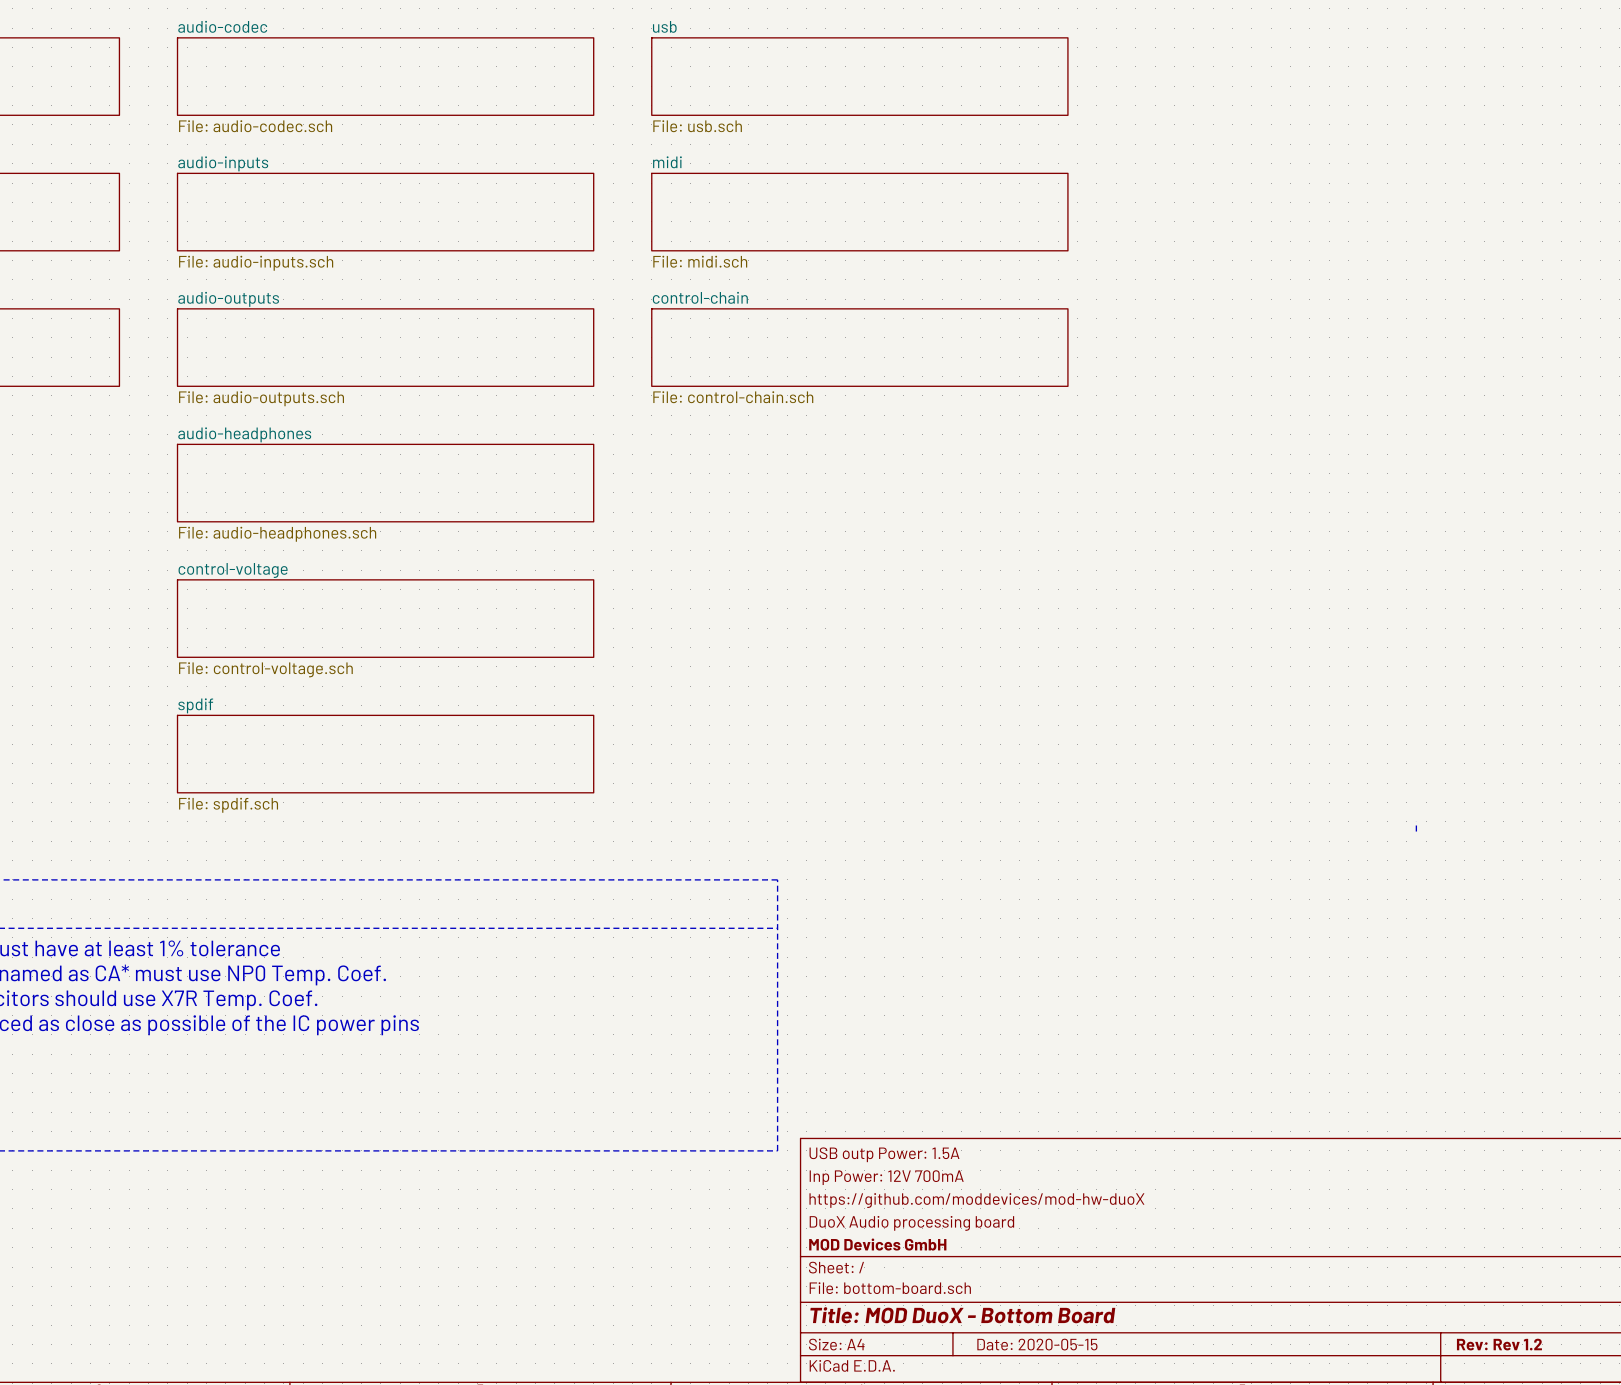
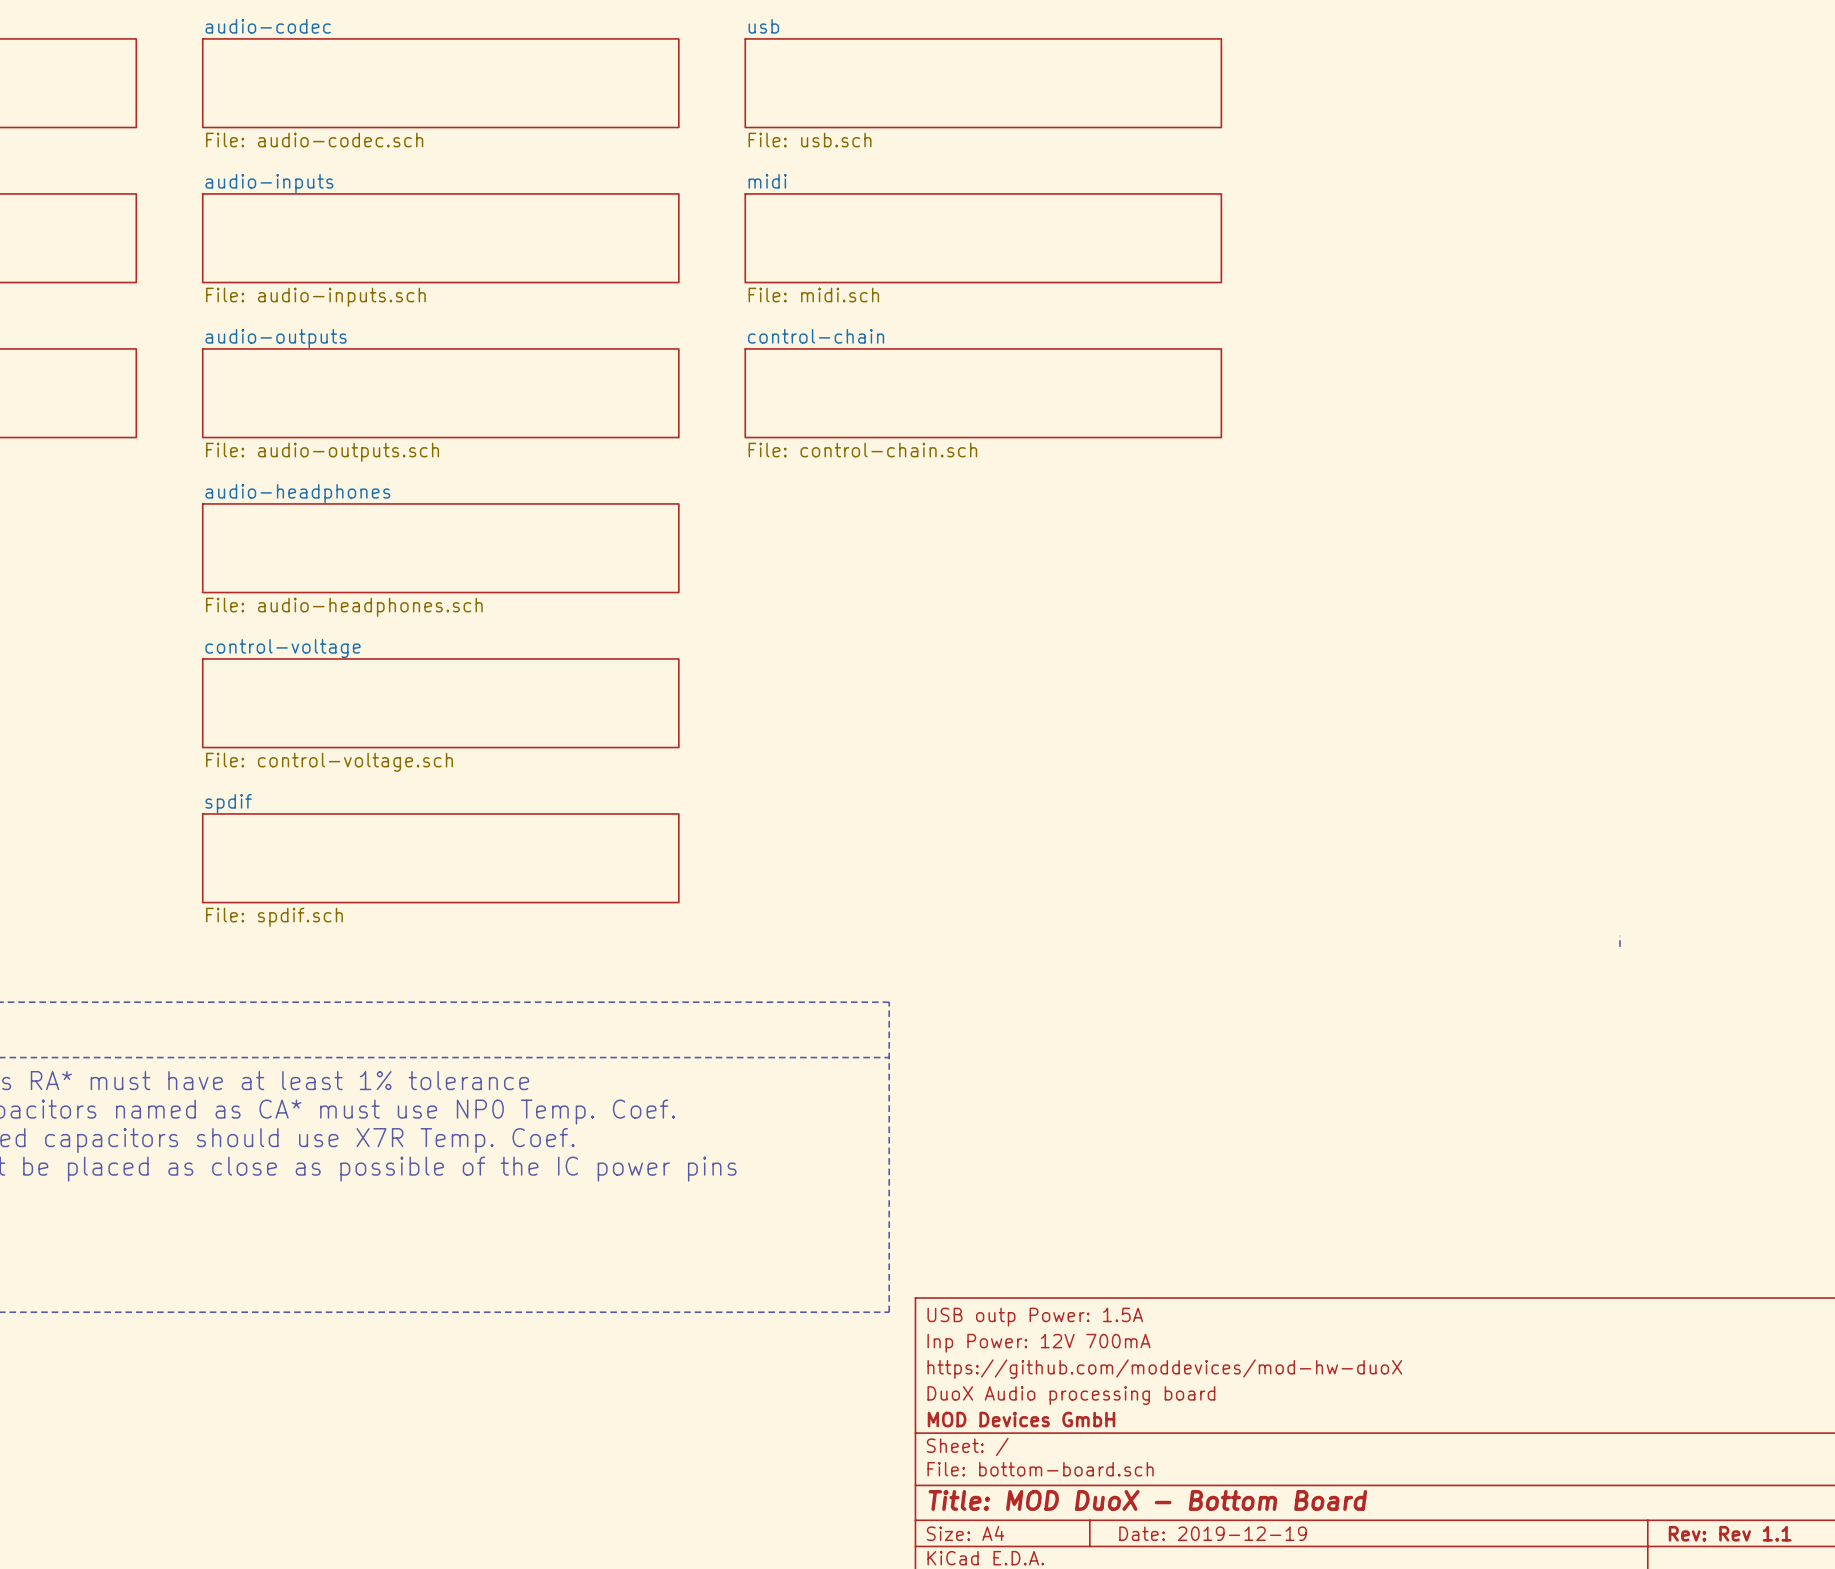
title block: Date: 2020-05-15 (1037, 1344) -> Date: 2019-12-19 (1213, 1533)
title block: Rev: Rev 1.2 (1499, 1344) -> Rev: Rev 1.1 (1730, 1533)

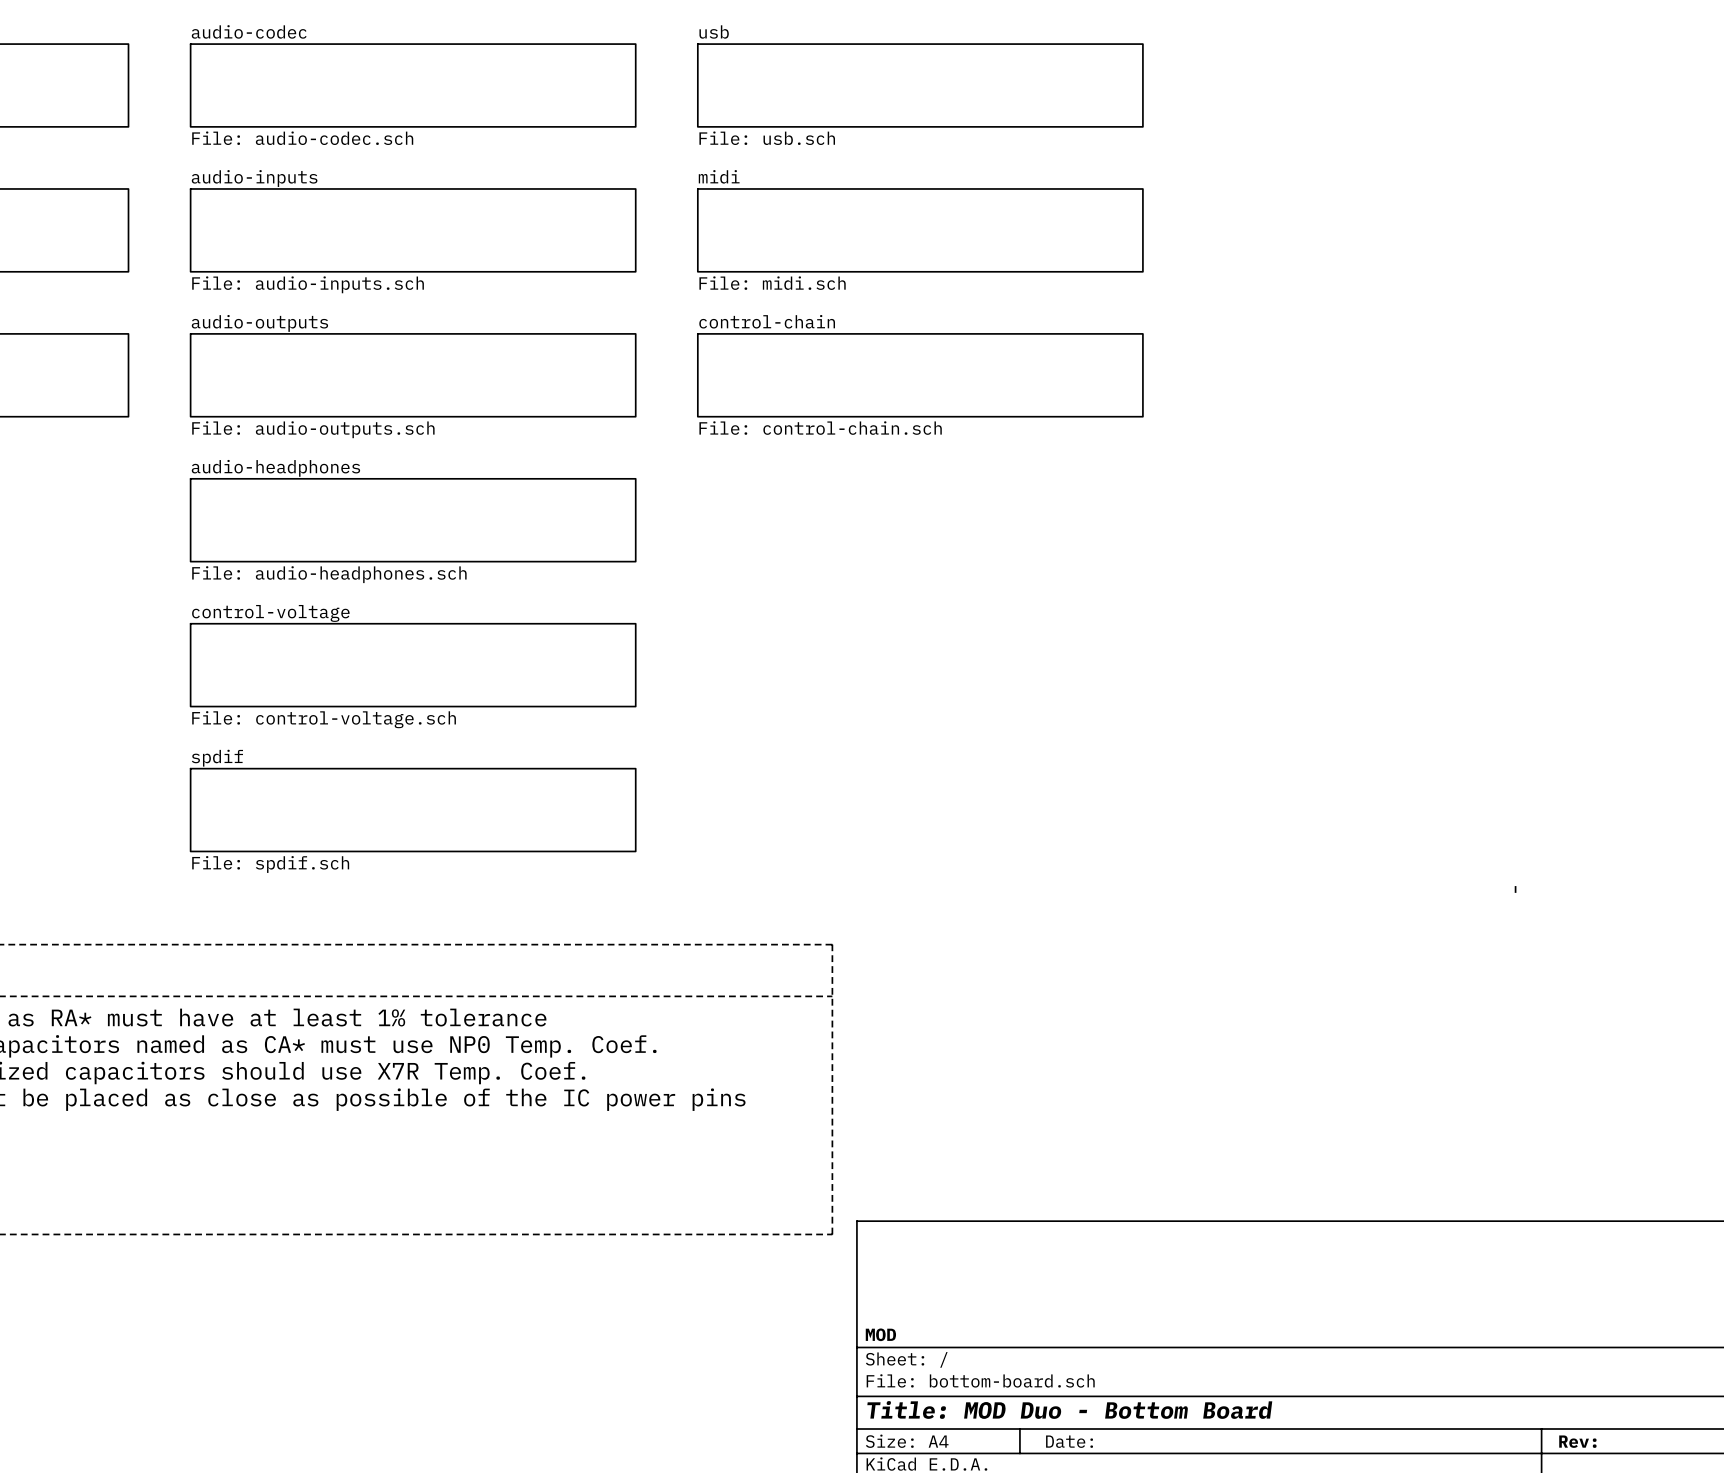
title block: USB outp Power: 1.5A (1035, 1317) -> none
title block: Inp Power: 12V 700mA (1039, 1343) -> none
title block: https://github.com/moddevices/mod-hw-duoX (1164, 1369) -> none
title block: DuoX Audio processing board (1071, 1395) -> none
title block: MOD Devices GmbH (1021, 1419) -> MOD (880, 1334)
title block: Title: MOD DuoX - Bottom Board (1147, 1500) -> Title: MOD Duo - Bottom Board (1069, 1409)
title block: Date: 2019-12-19 (1213, 1533) -> Date: (1069, 1441)
title block: Rev: Rev 1.1 (1730, 1533) -> Rev: (1577, 1441)

